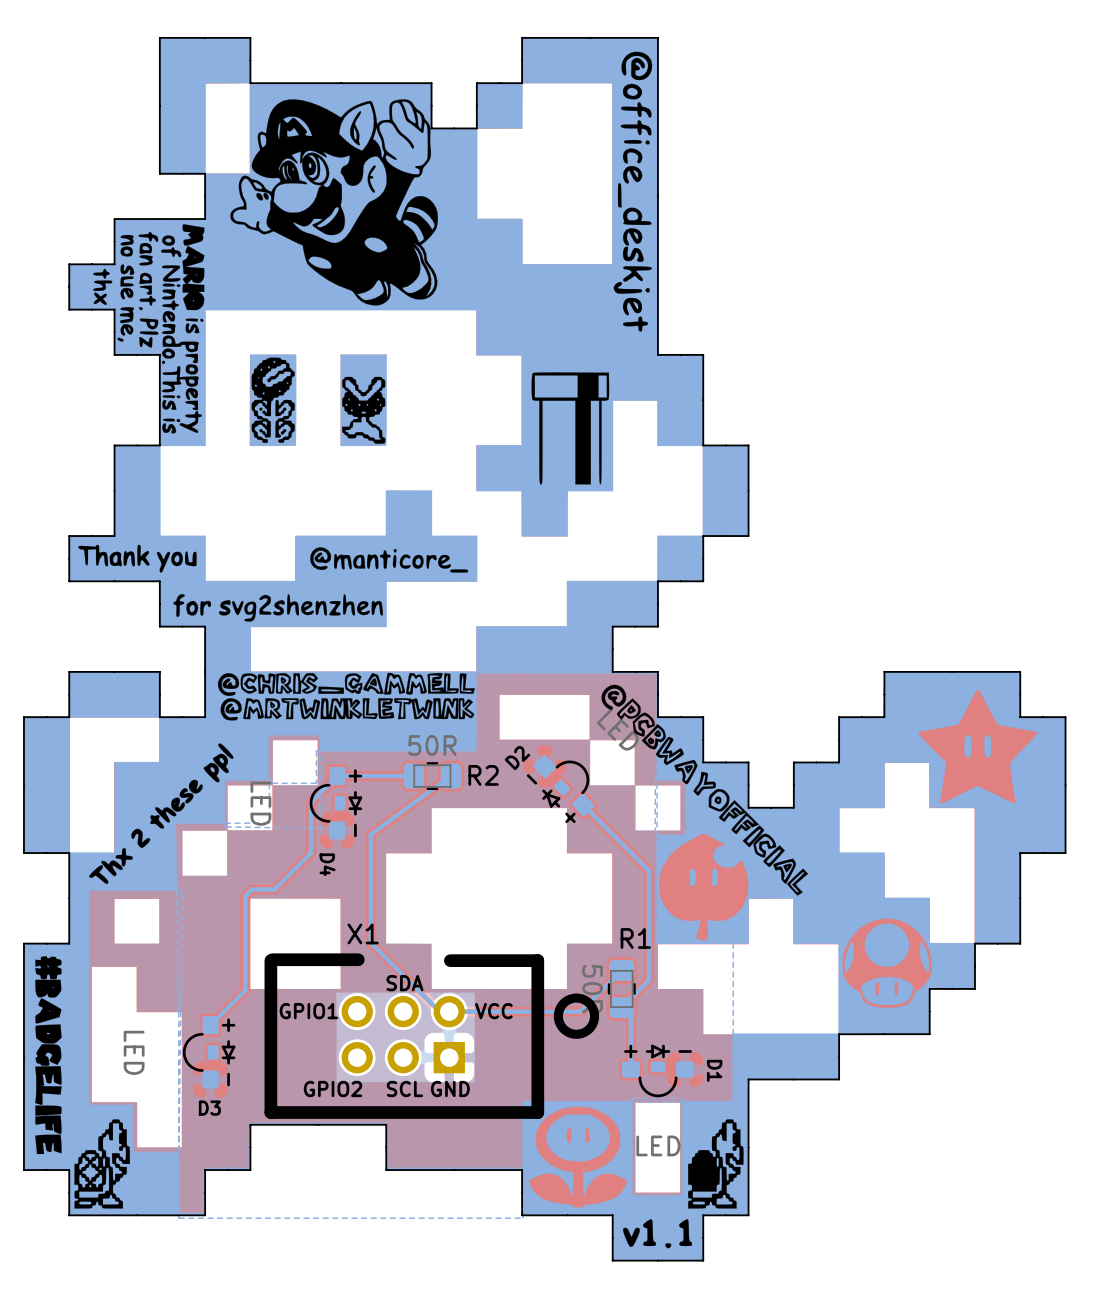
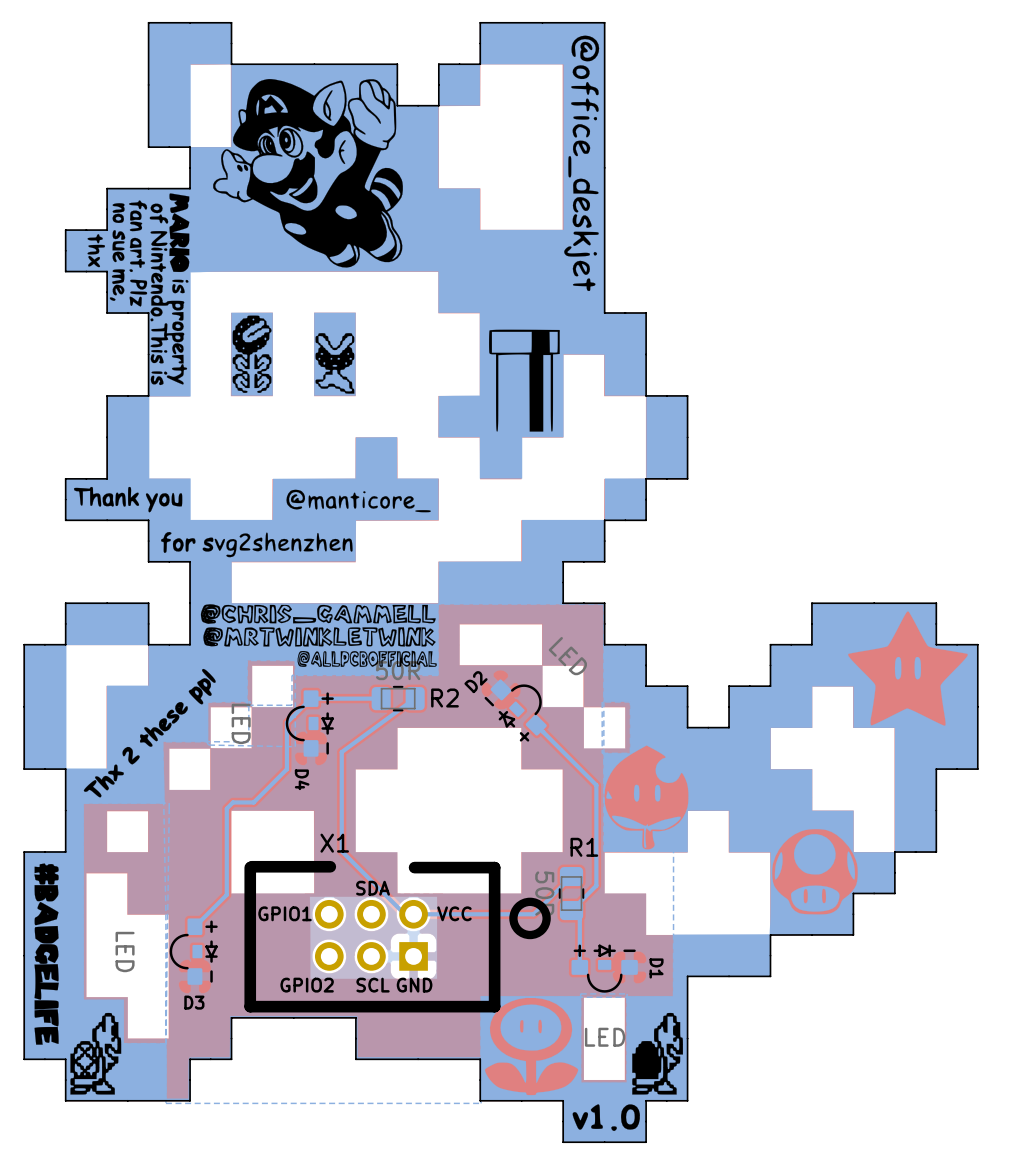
drawing shape: [23, 37, 1066, 1261] -> [24, 22, 978, 1143]
drawing: [35, 51, 809, 1249] -> none
drawing: none -> [34, 35, 683, 1132]

